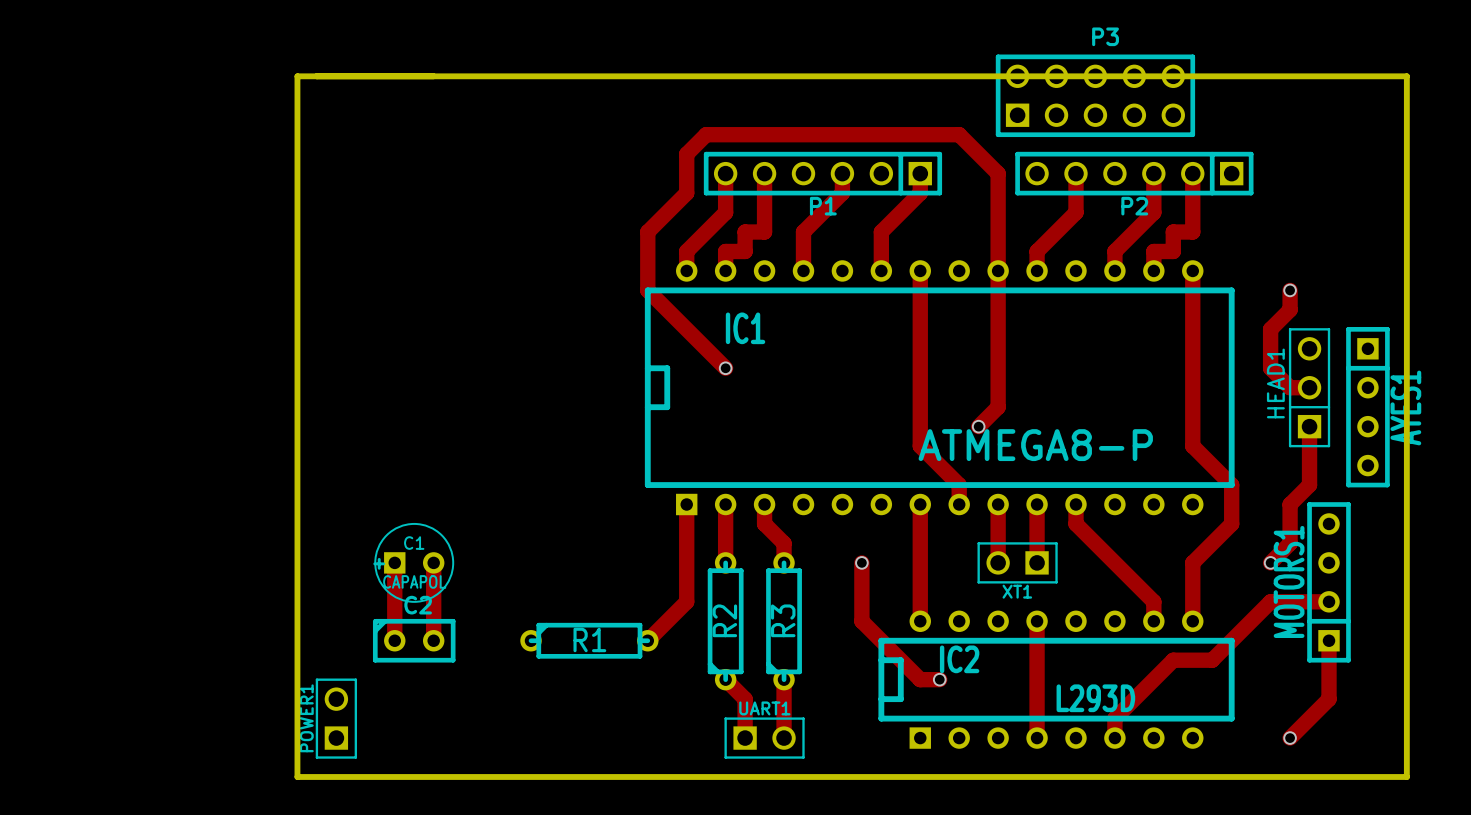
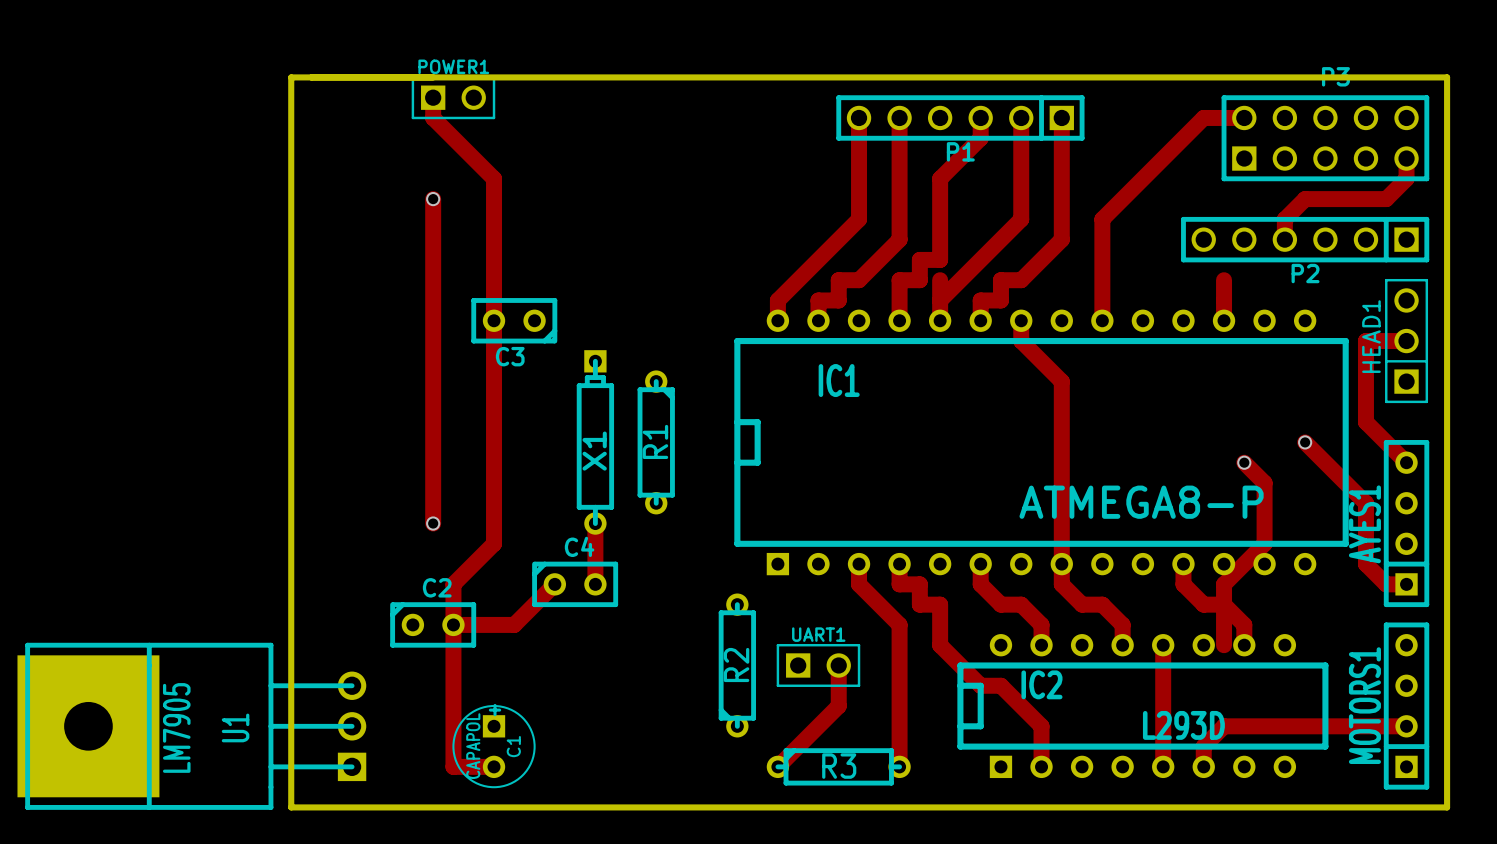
track: none -> (433, 97) (433, 117) (494, 178) (494, 543) (453, 584) (453, 766) (494, 766)
P3 position: (1095, 95) -> (1325, 138)
track: none -> (859, 117) (859, 178)
track: none -> (899, 117) (899, 239) (859, 280) (838, 280) (838, 300) (818, 300) (818, 320)
track: none -> (980, 117) (980, 138) (940, 178)
track: none -> (1061, 117) (1061, 239) (1021, 280) (1000, 280) (1000, 300) (980, 300) (980, 320)
track: none -> (1244, 117) (1203, 117) (1102, 219) (1102, 320)
track: none -> (1406, 158) (1406, 178) (1386, 199) (1305, 199) (1284, 219) (1284, 239)
track: (725, 173) (725, 212) (686, 251) (686, 270) -> none
track: (764, 173) (764, 232) (745, 232) (745, 251) (725, 251) (725, 270) -> none
P1 position: (822, 173) -> (960, 117)
track: (998, 173) (959, 134) (706, 134) (686, 154) (686, 193) (647, 232) (647, 290) (725, 368) -> (1021, 178) (1021, 117)
track: (1075, 173) (1075, 212) (1037, 251) (1037, 270) -> none
P2 position: (1134, 173) -> (1305, 239)
track: (1153, 173) (1153, 212) (1114, 251) (1114, 270) -> none
track: (1192, 173) (1192, 232) (1173, 232) (1173, 251) (1153, 251) (1153, 270) -> none
track: none -> (433, 199) (433, 523)
via: none -> (433, 199)
track: (842, 193) (803, 232) (803, 270) -> (859, 199) (859, 219) (777, 300) (777, 320)
track: (920, 193) (881, 232) (881, 270) -> (940, 199) (940, 259) (919, 259) (919, 280) (899, 280) (899, 320)
track: (998, 212) (998, 309) -> (1021, 219) (940, 300)
track: (1290, 290) (1290, 309) (1270, 329) (1270, 368) (1290, 387) (1309, 387) -> none
via: (1290, 290) -> none
C3: none -> (514, 320)
track: (920, 309) (920, 446) (959, 485) (959, 504) -> none
track: (1192, 309) (1192, 446) (1231, 485) -> (1244, 462) (1264, 482) (1264, 503)
track: (998, 329) (998, 407) (978, 426) -> (1021, 341) (1061, 381) (1061, 523)
track: none -> (1406, 341) (1365, 341) (1365, 422) (1406, 462)
via: (725, 368) -> none
IC1 position: (939, 387) -> (1041, 442)
HEAD1 position: (1309, 387) -> (1406, 341)
AYES1 rotation: 0° (1367, 407) -> 180° (1406, 523)
AYES1 position: (1367, 407) -> (1406, 523)
X1: none -> (595, 442)
via: (978, 426) -> none
track: none -> (1305, 442) (1365, 503) (1365, 564) (1386, 584) (1406, 584)
via: none -> (1305, 442)
track: (1309, 426) (1309, 485) (1290, 504) (1290, 543) (1270, 562) -> none
via: none -> (1244, 462)
via: none -> (433, 523)
track: (686, 504) (686, 601) (647, 640) -> none
track: (725, 504) (725, 562) -> (595, 523) (595, 584)
track: (764, 504) (764, 523) (784, 543) (784, 562) -> none
track: (920, 504) (920, 582) -> (899, 564) (899, 584) (919, 584) (919, 604) (940, 604)
track: (998, 504) (998, 562) -> none
track: (1075, 504) (1075, 523) (1153, 601) (1153, 621) -> none
track: none -> (859, 564) (859, 584) (899, 624) (899, 766)
track: none -> (980, 564) (980, 584) (1000, 604) (1021, 604) (1041, 624) (1041, 645)
track: none -> (1183, 564) (1183, 584) (1203, 604) (1224, 604) (1244, 624) (1244, 645)
track: (394, 562) (394, 640) -> none
C1 rotation: 0° (414, 562) -> 90° clockwise (494, 746)
C1 position: (414, 562) -> (494, 746)
track: (433, 562) (433, 640) -> none
track: none -> (554, 584) (514, 624) (453, 624)
C4: none -> (575, 584)
track: (861, 562) (861, 621) (920, 679) (939, 679) -> none
via: (861, 562) -> none
XT1: (1017, 562) -> none
track: none -> (1061, 584) (1082, 604) (1102, 604) (1122, 624) (1122, 645)
via: (1270, 562) -> none
MOTORS1 position: (1329, 582) -> (1406, 706)
track: (1329, 601) (1270, 601) (1212, 660) (1173, 660) (1114, 718) (1114, 738) -> none
R2 position: (725, 621) -> (737, 665)
R3 rotation: 0° (784, 621) -> 90° clockwise (838, 766)
R3 position: (784, 621) -> (838, 766)
track: none -> (940, 645) (980, 685) (1000, 685) (1041, 726) (1041, 766)
track: (1037, 621) (1037, 738) -> (1163, 645) (1163, 766)
C2 position: (414, 640) -> (433, 624)
R1 rotation: 0° (589, 640) -> 90° clockwise (656, 442)
R1 position: (589, 640) -> (656, 442)
track: none -> (838, 665) (838, 706) (777, 766)
track: (1329, 640) (1329, 699) (1290, 738) -> none
track: (725, 679) (745, 699) (745, 738) -> none
track: (784, 679) (784, 738) -> none
via: (939, 679) -> none
IC2 position: (1056, 679) -> (1142, 706)
U1: none -> LM7905 (191, 726)
track: none -> (1406, 726) (1224, 726) (1203, 746) (1203, 766)
POWER1 rotation: 0° (336, 718) -> 90° clockwise (453, 97)
POWER1 position: (336, 718) -> (453, 97)
UART1 position: (764, 738) -> (818, 665)
via: (1290, 738) -> none

